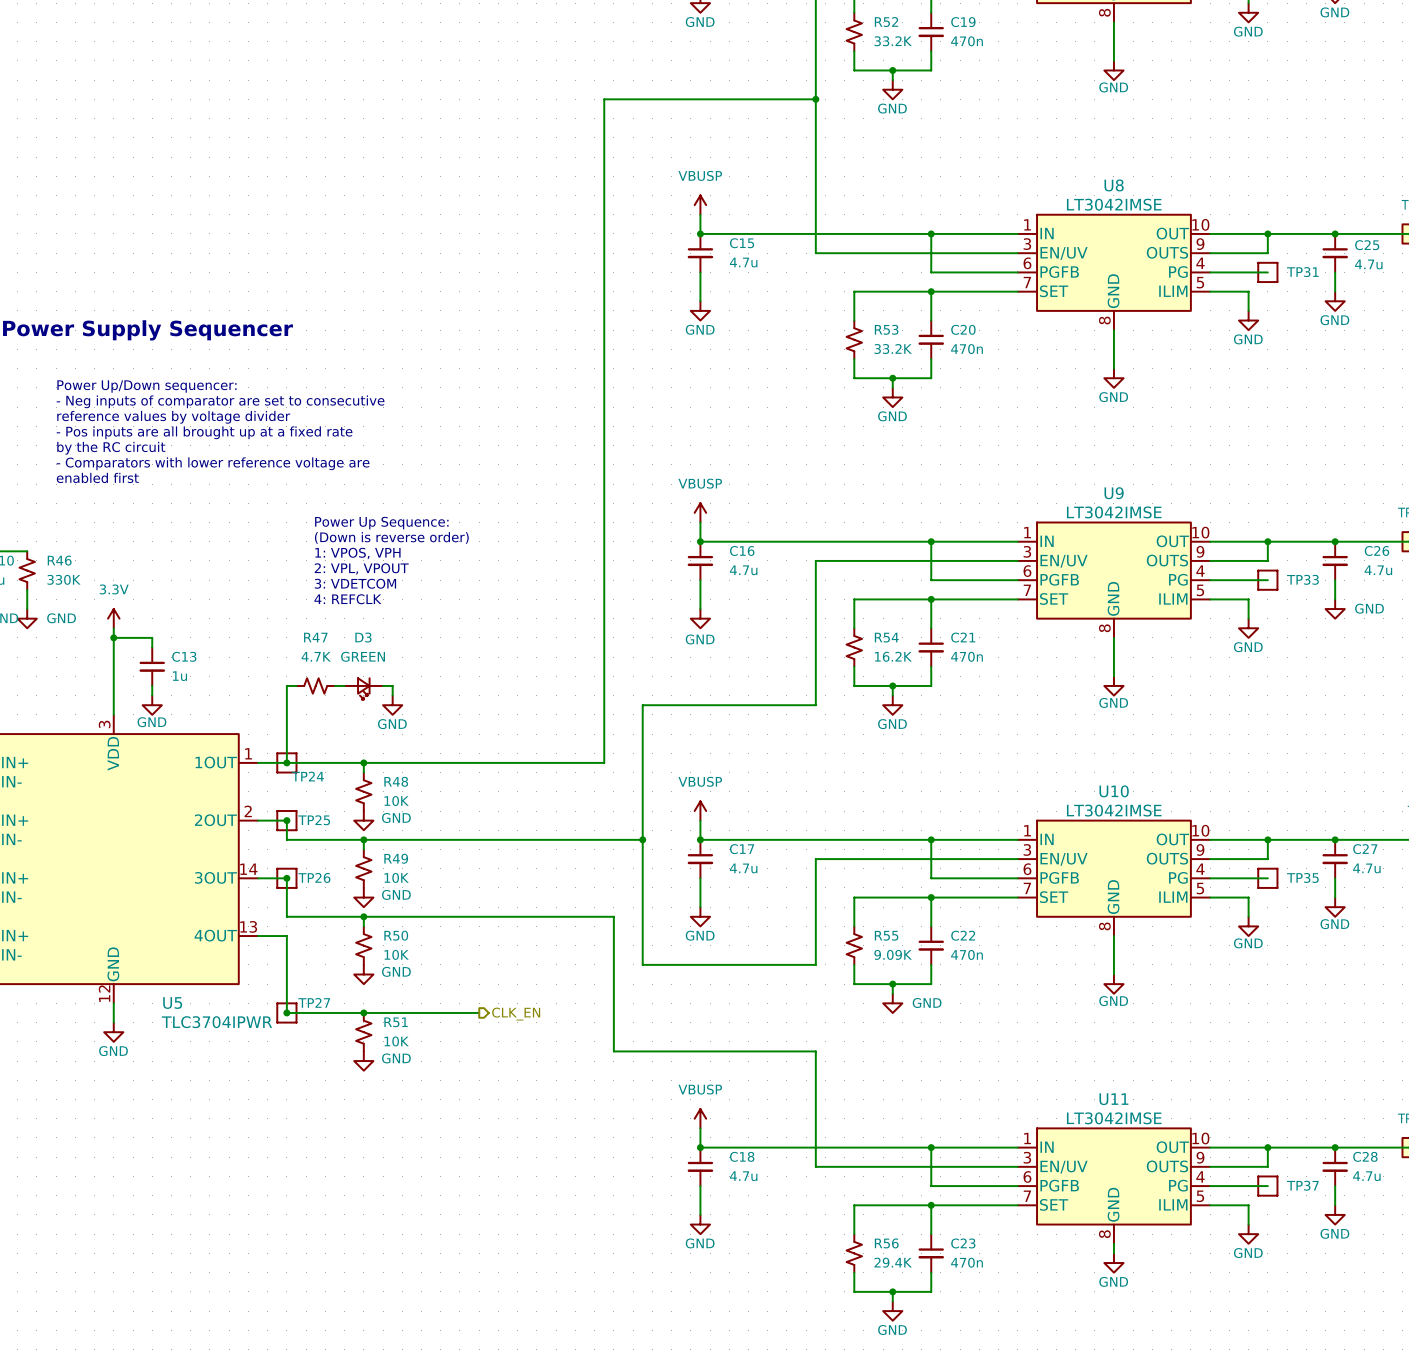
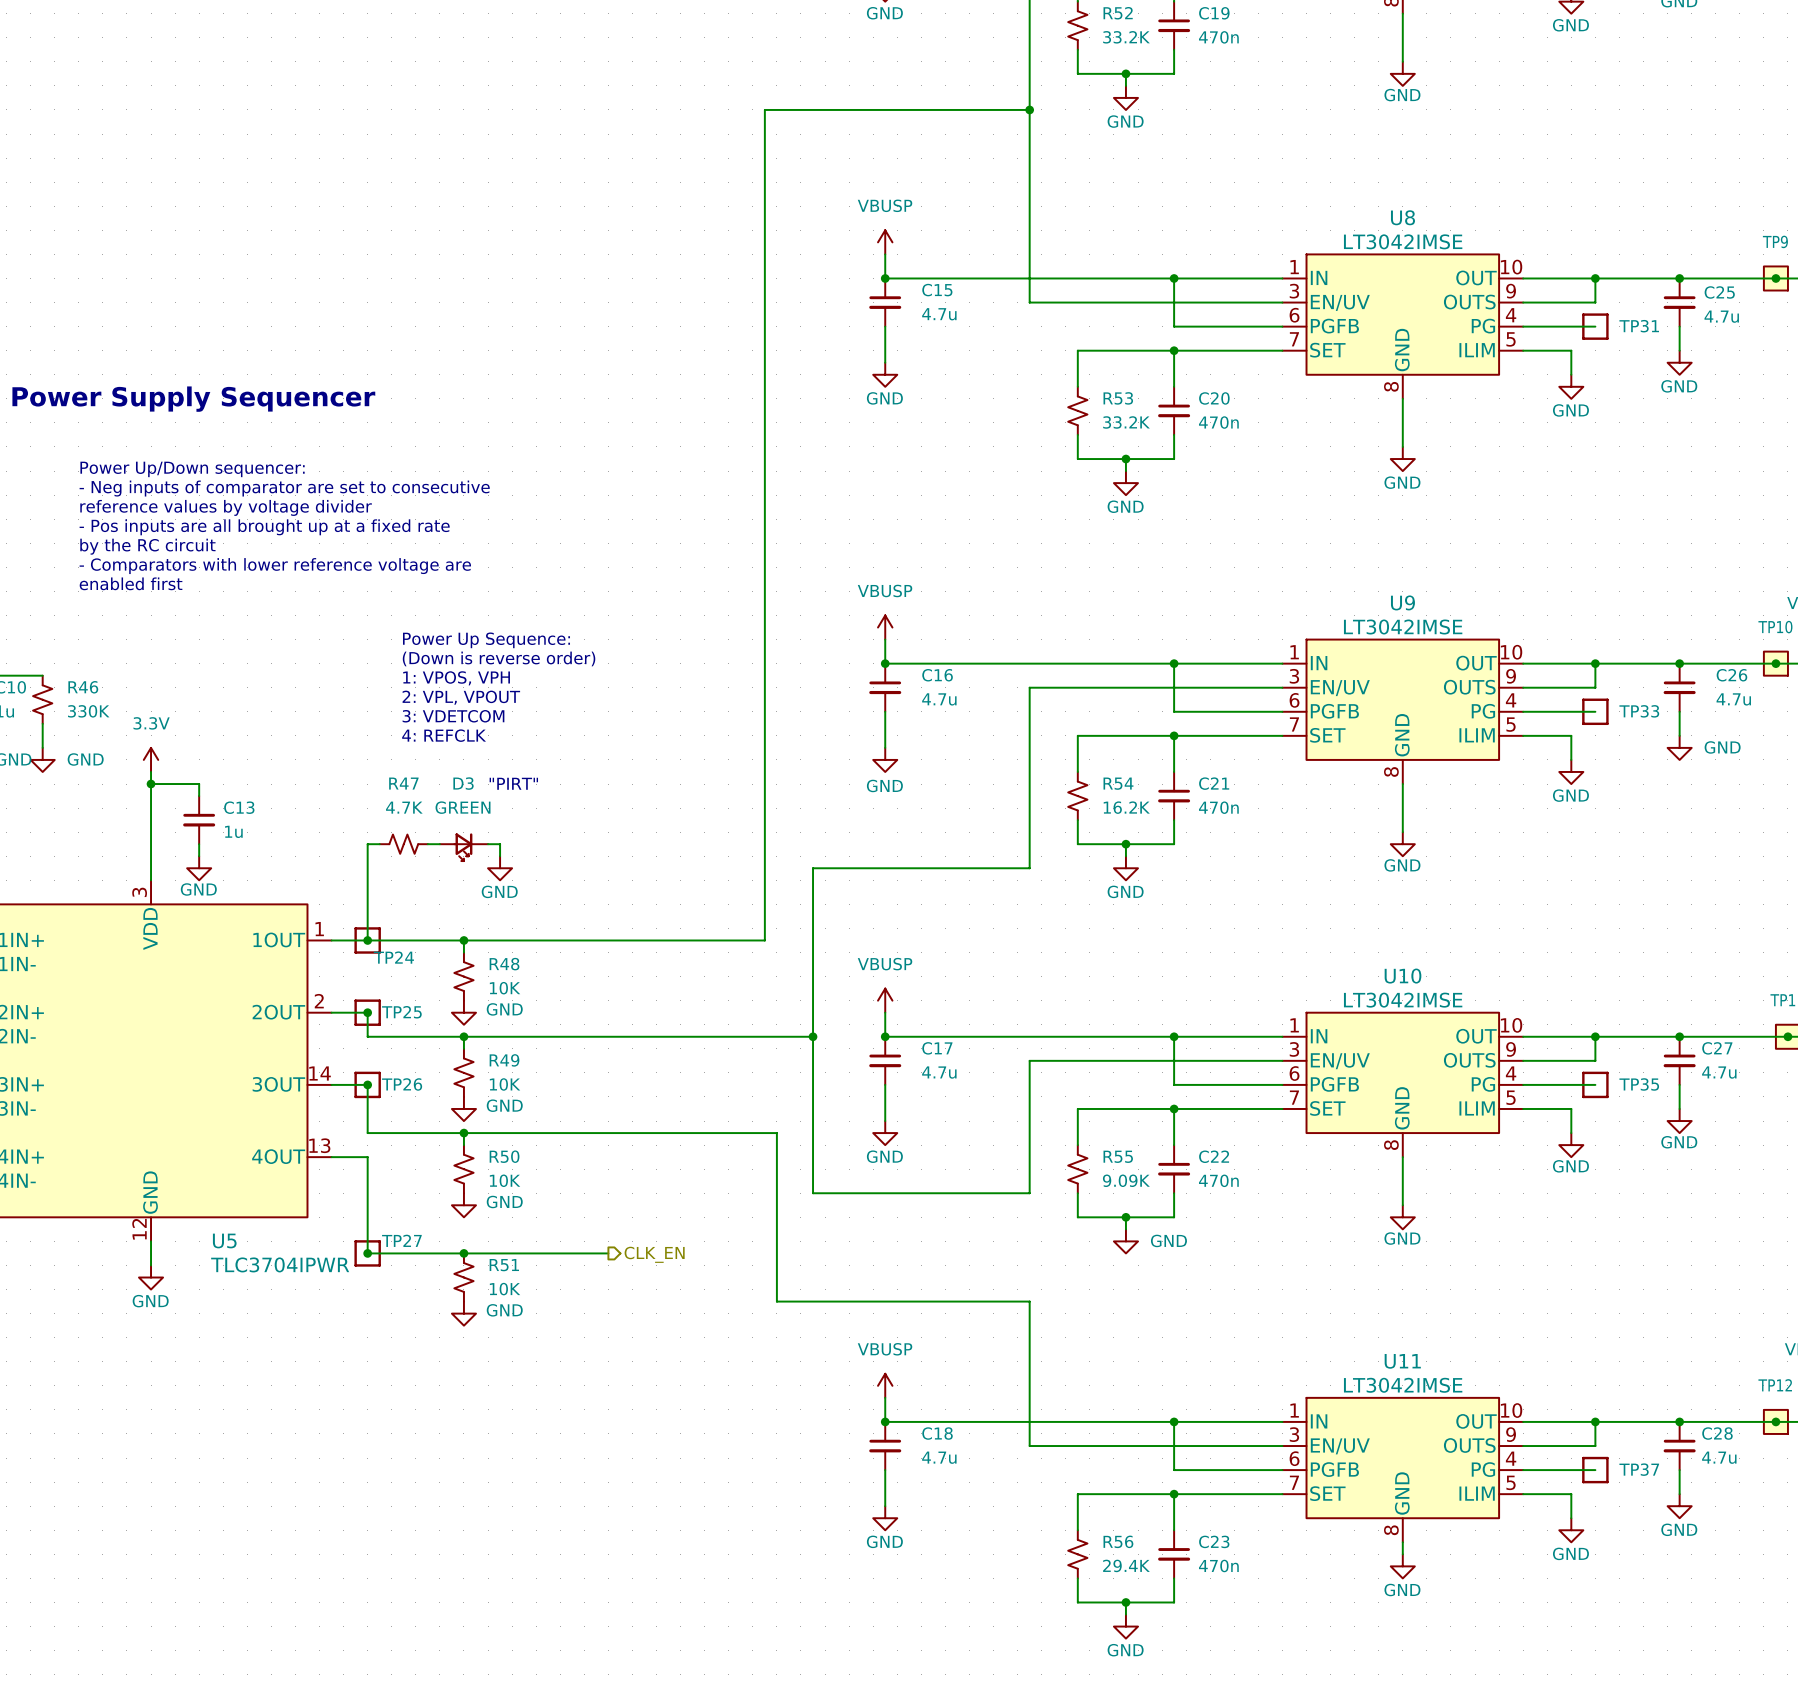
text: none -> "PIRT" (513, 783)

